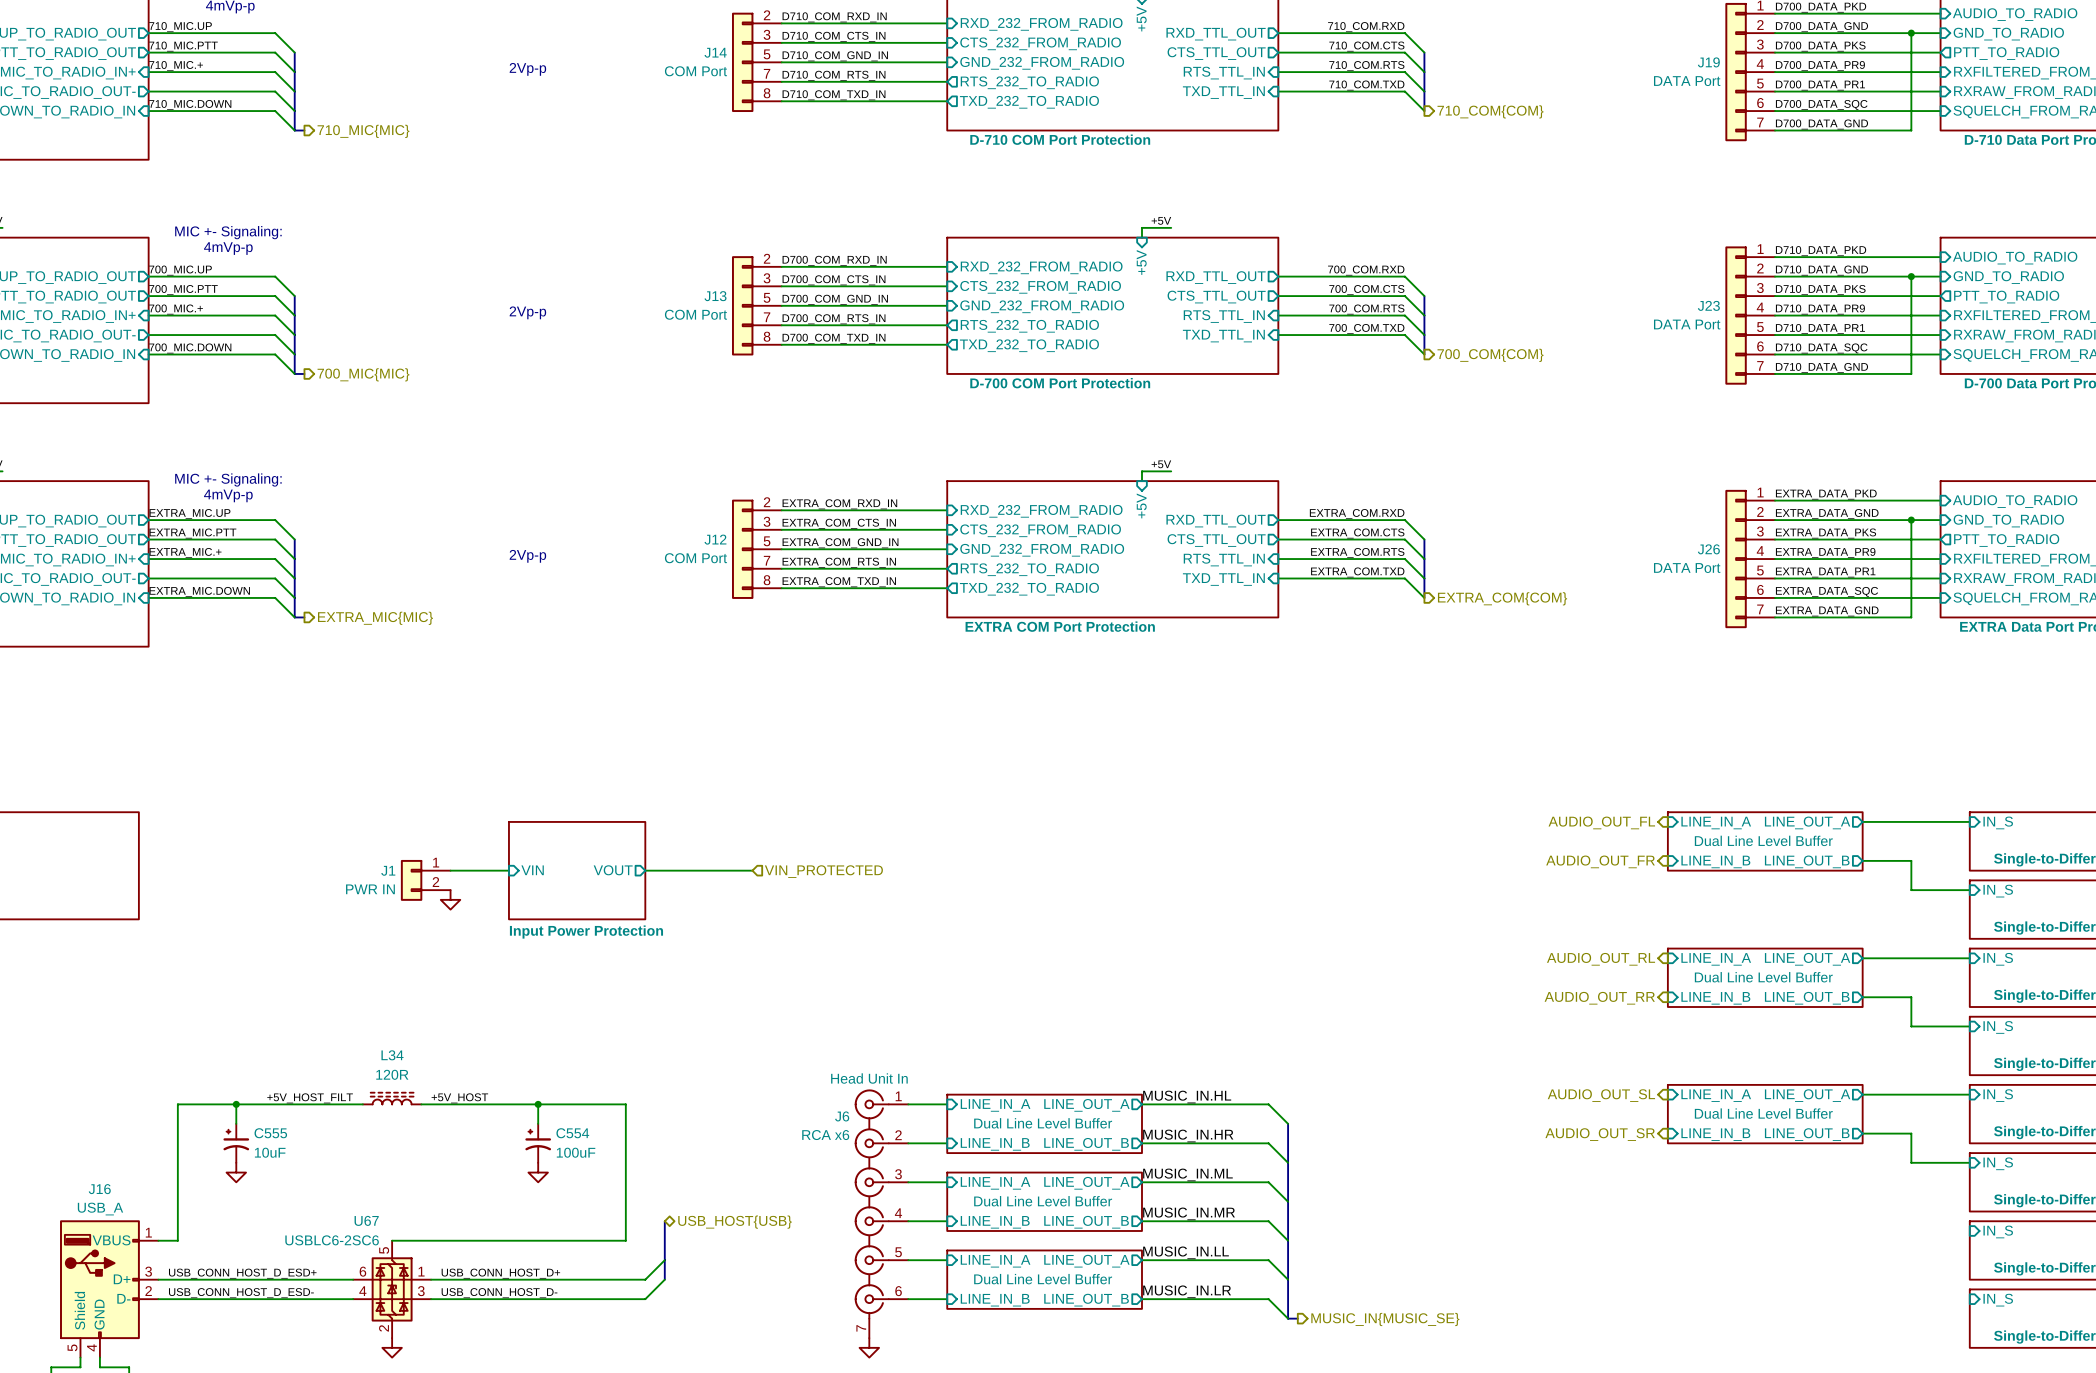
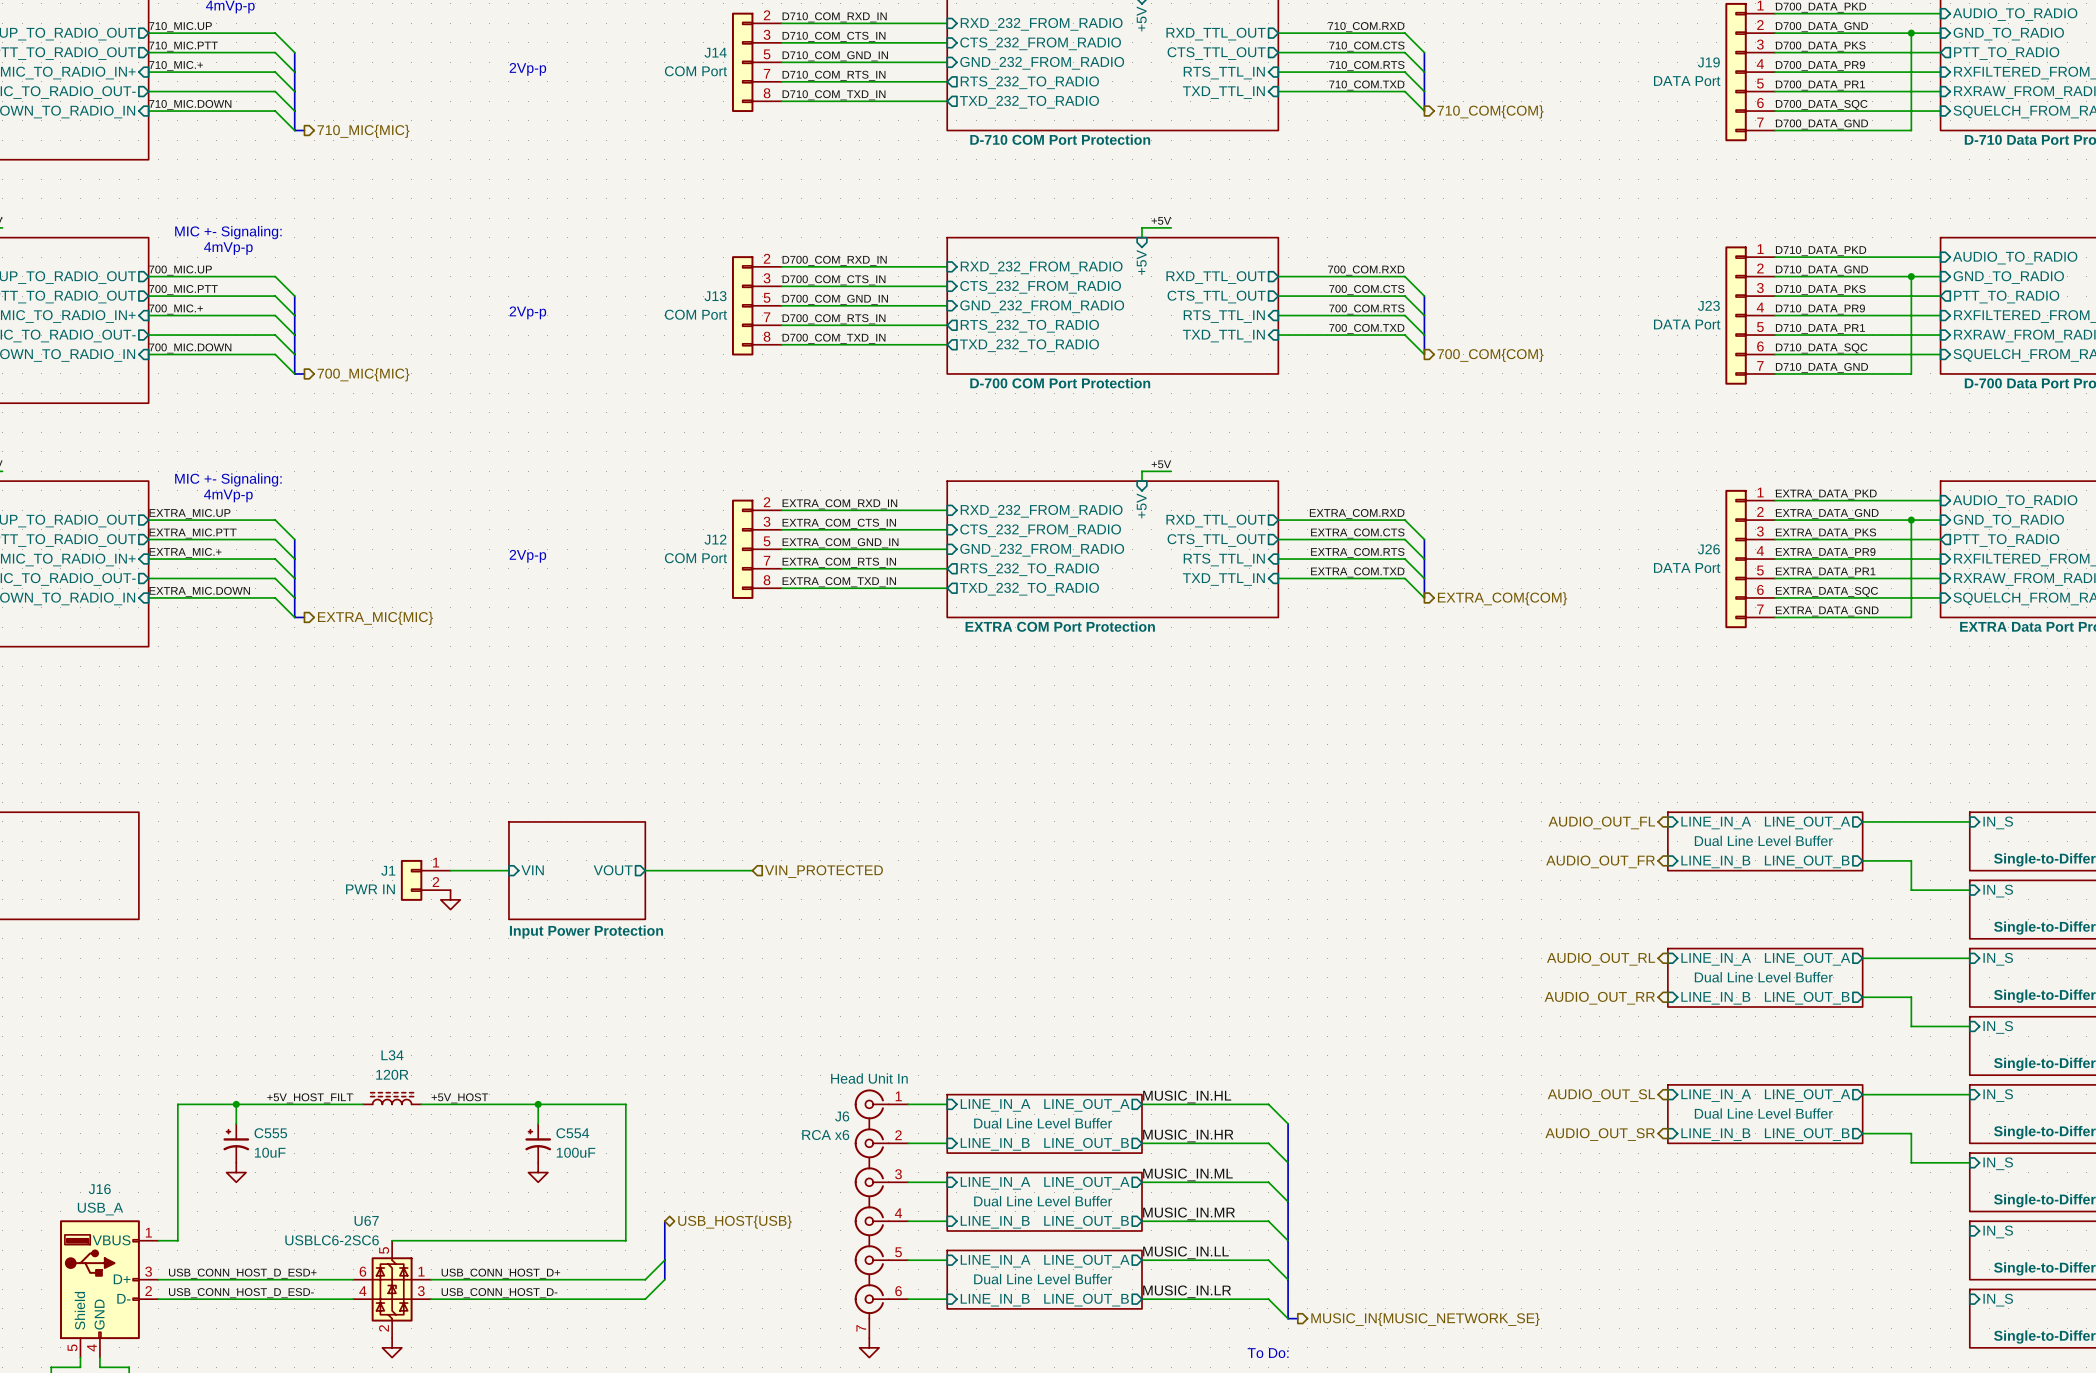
hierarchical label: MUSIC_IN{MUSIC_SE} (1385, 1319) -> MUSIC_IN{MUSIC_NETWORK_SE} (1425, 1319)
text: none -> To Do: (1268, 1353)

